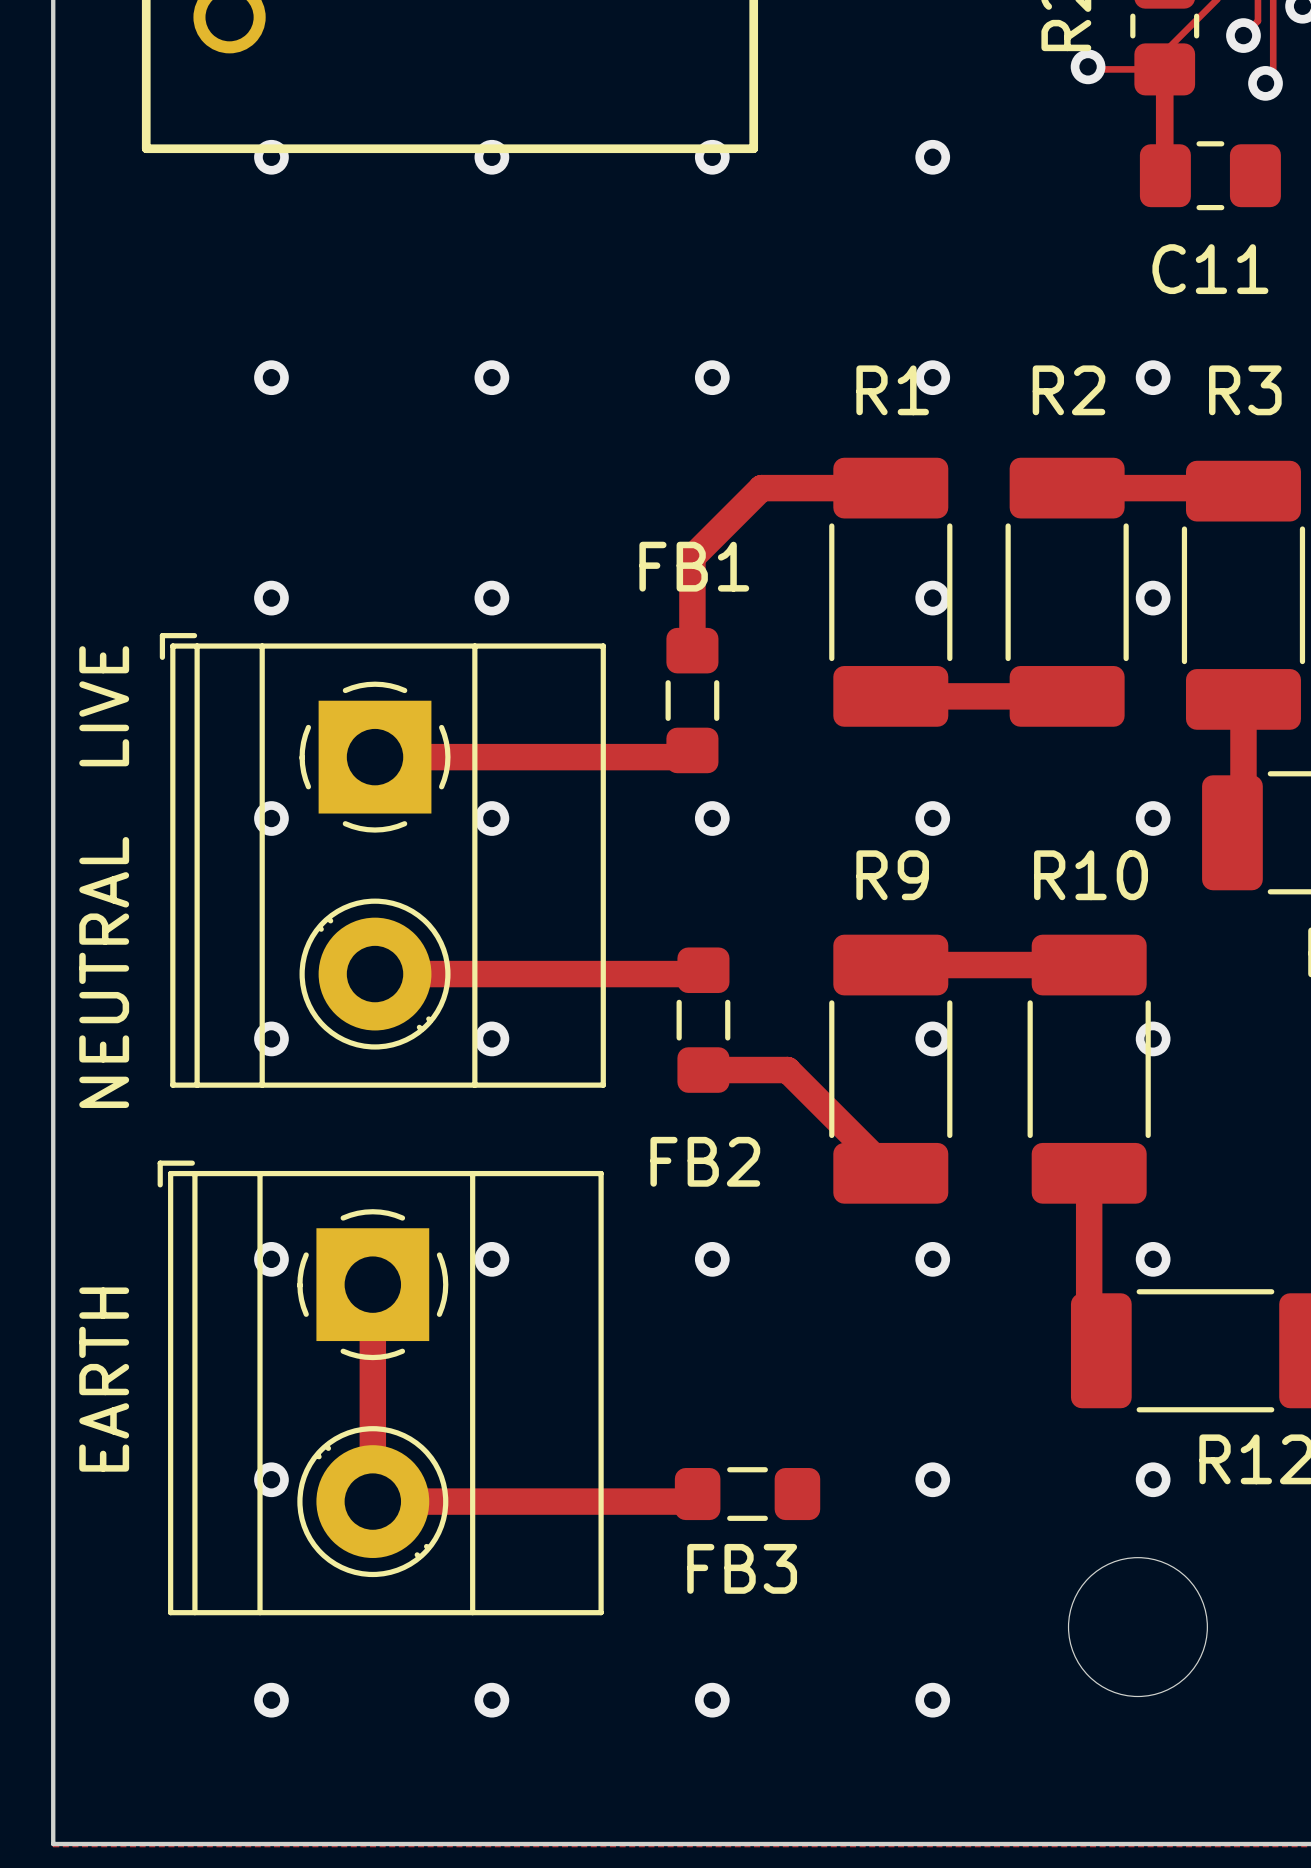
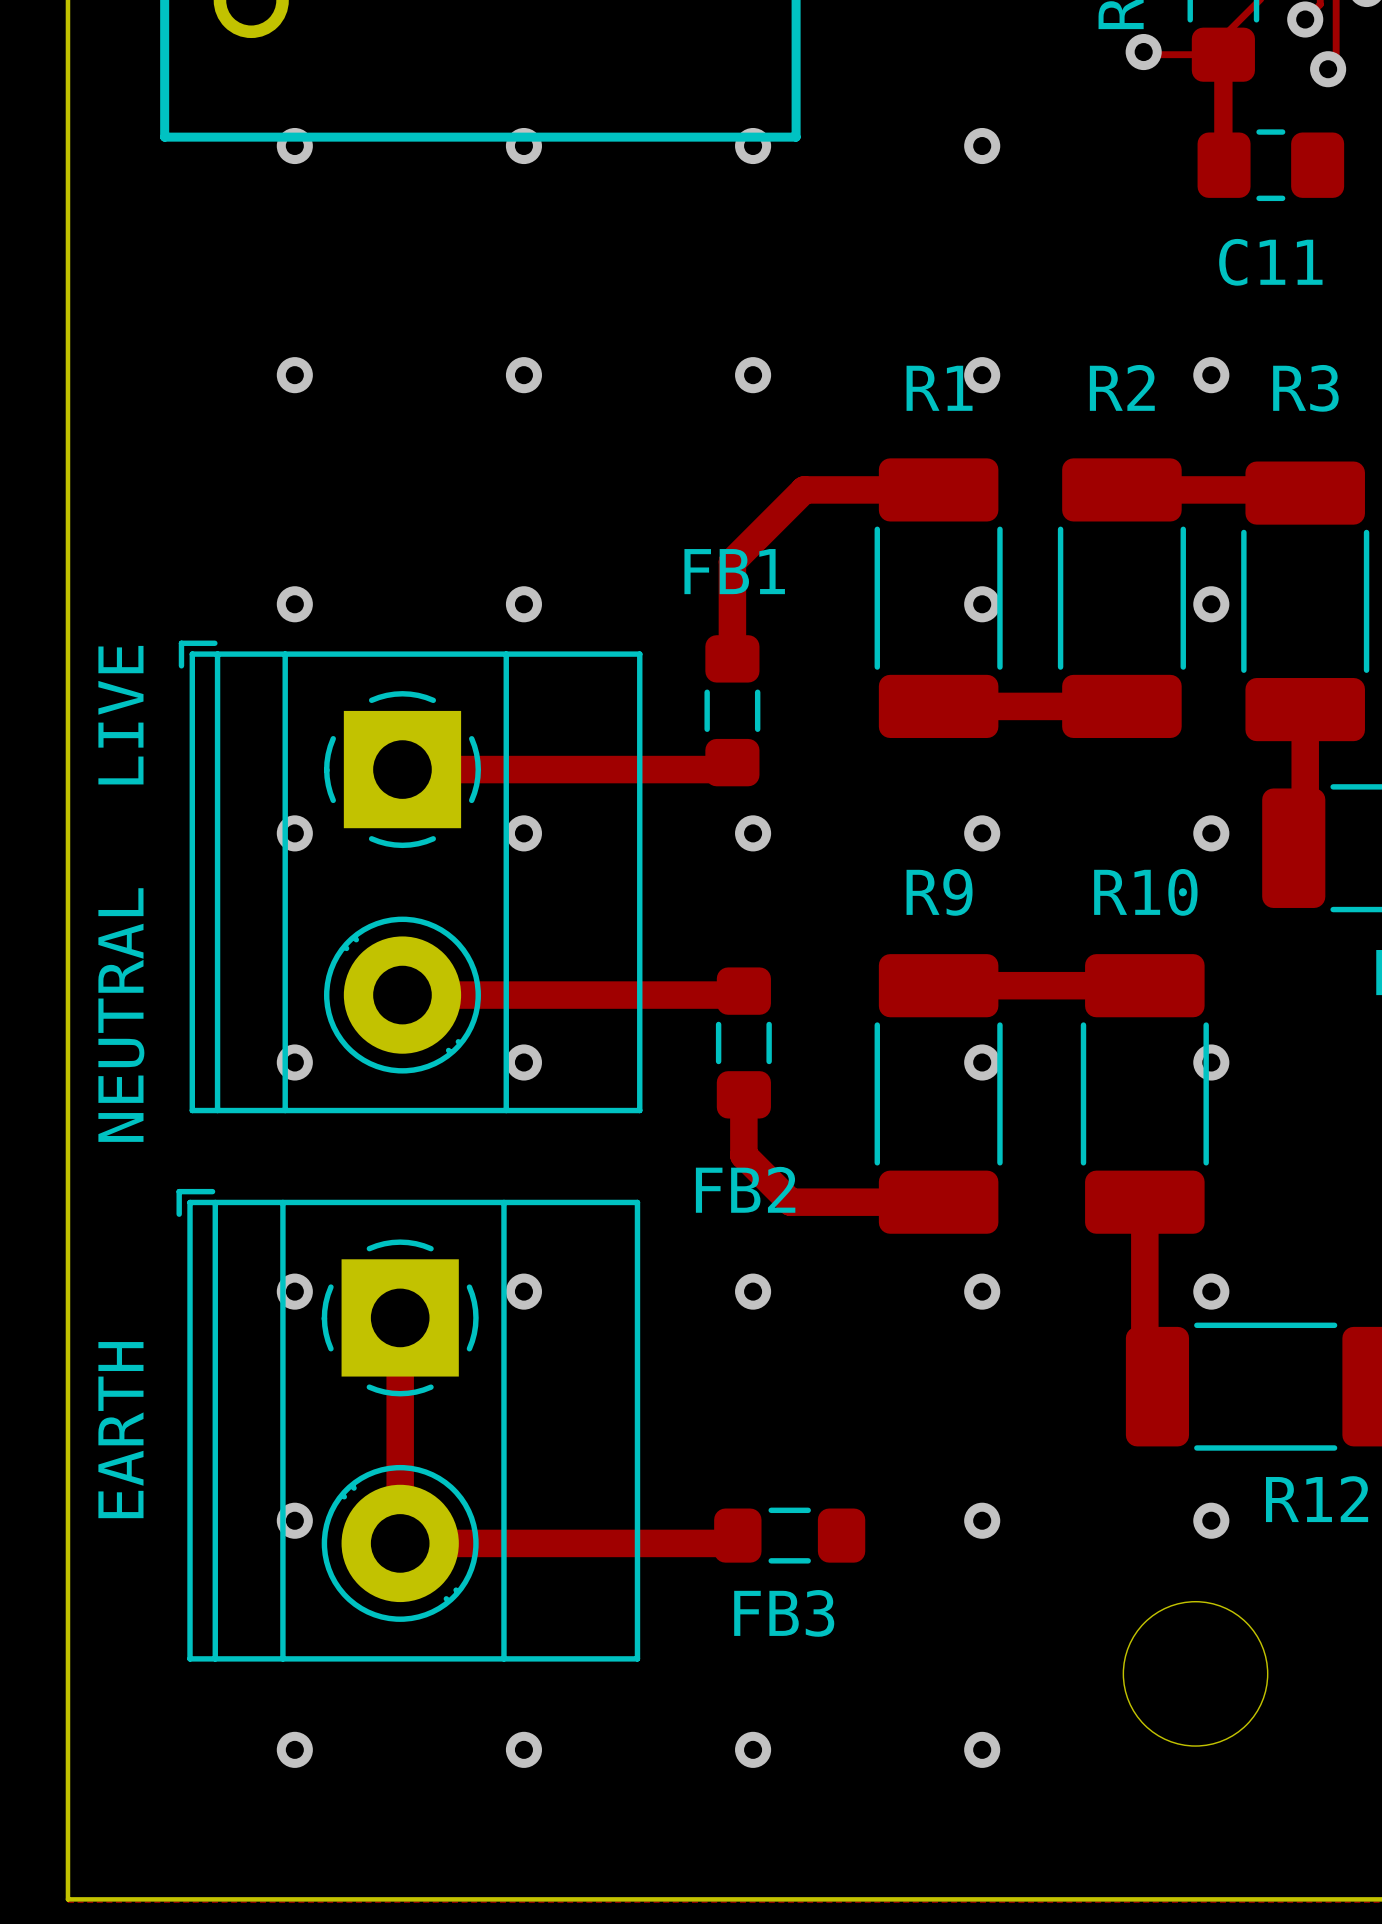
track: (703, 1070) (787, 1070) (890, 1173) -> (743, 1094) (743, 1155) (790, 1202) (938, 1202)

